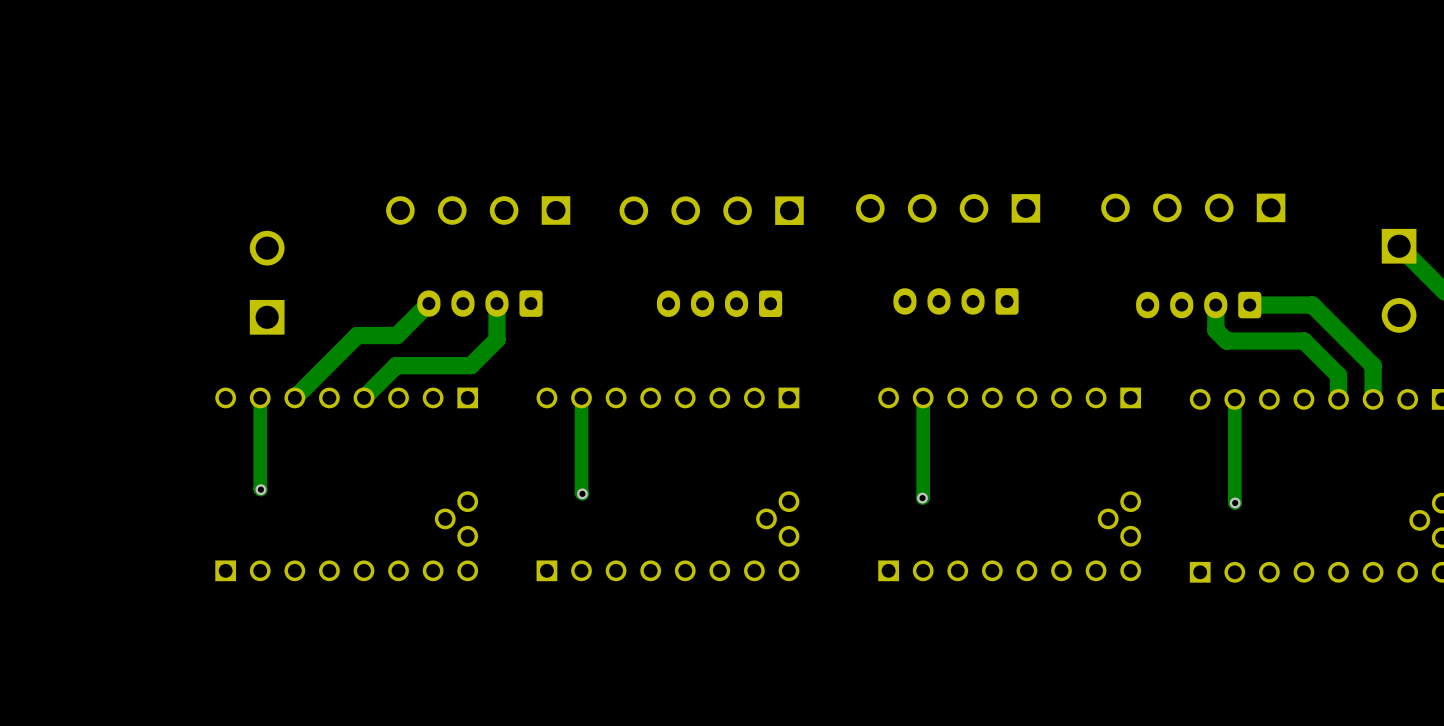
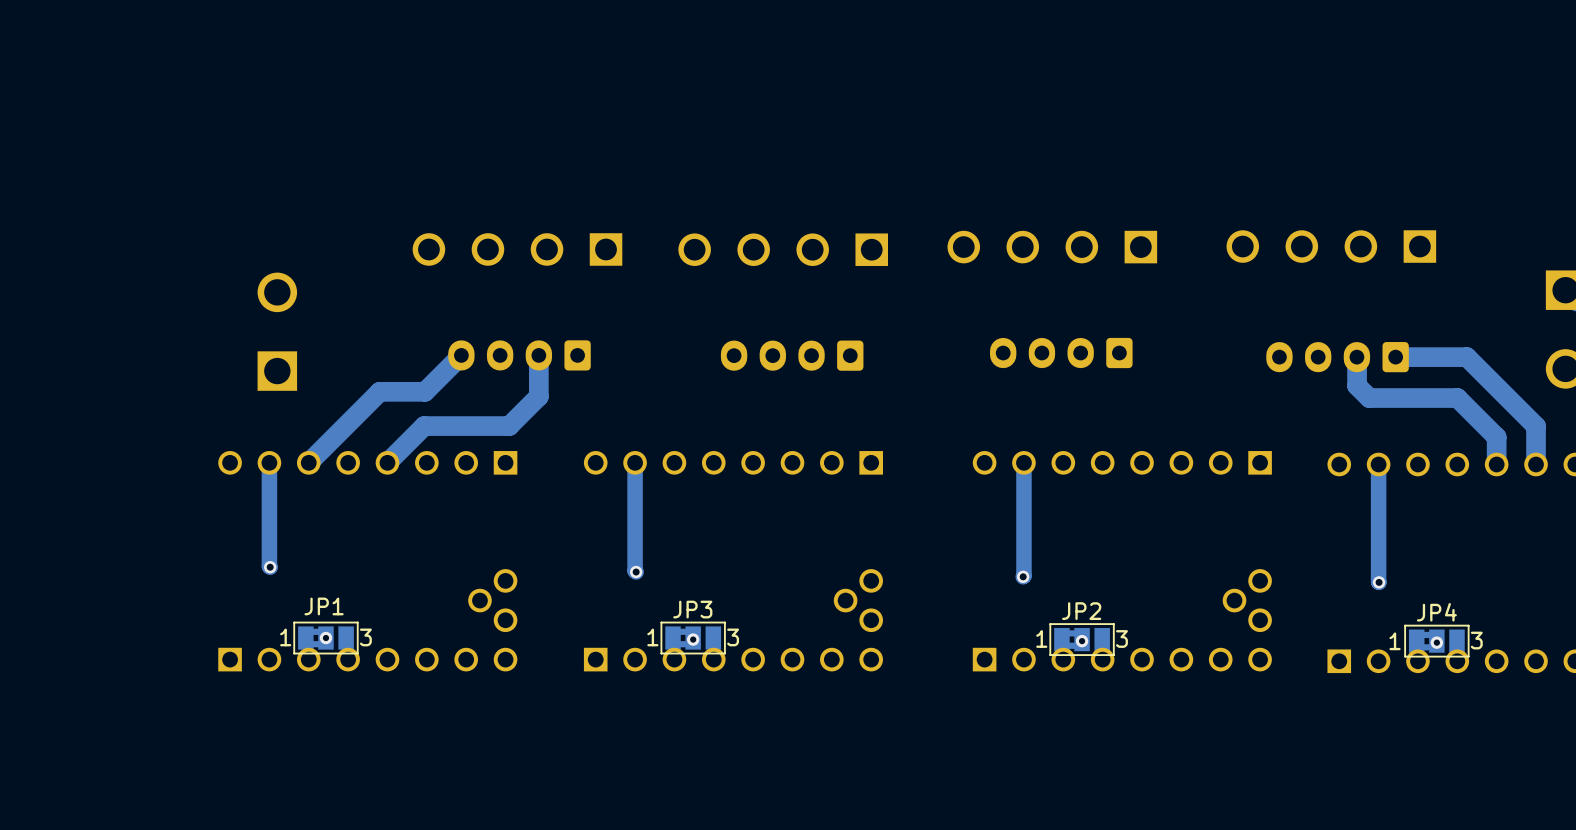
JP1: none -> (325, 638)
via: none -> (325, 638)
JP3: none -> (693, 638)
via: none -> (693, 639)
JP2: none -> (1082, 639)
via: none -> (1082, 641)
JP4: none -> (1436, 641)
via: none -> (1436, 642)

